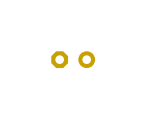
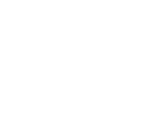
part: (73, 59) -> none

